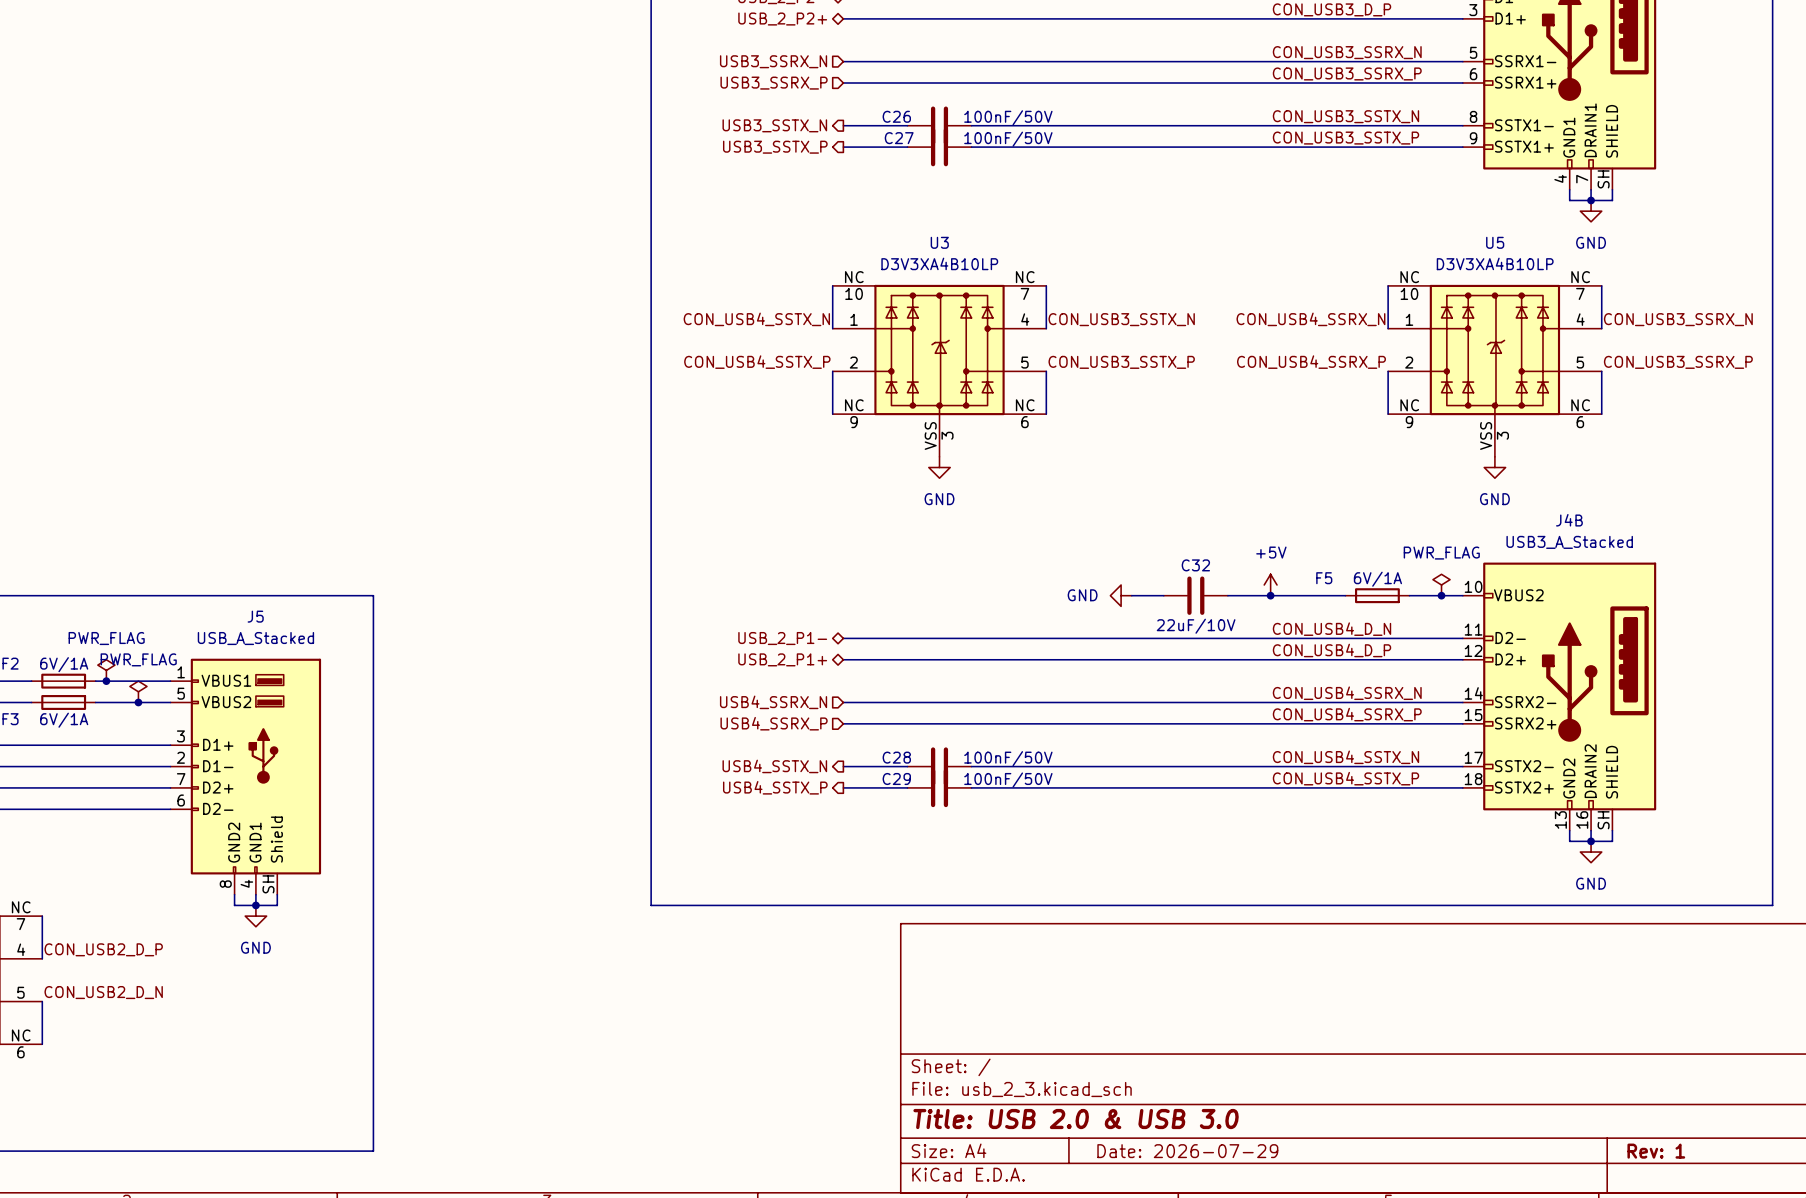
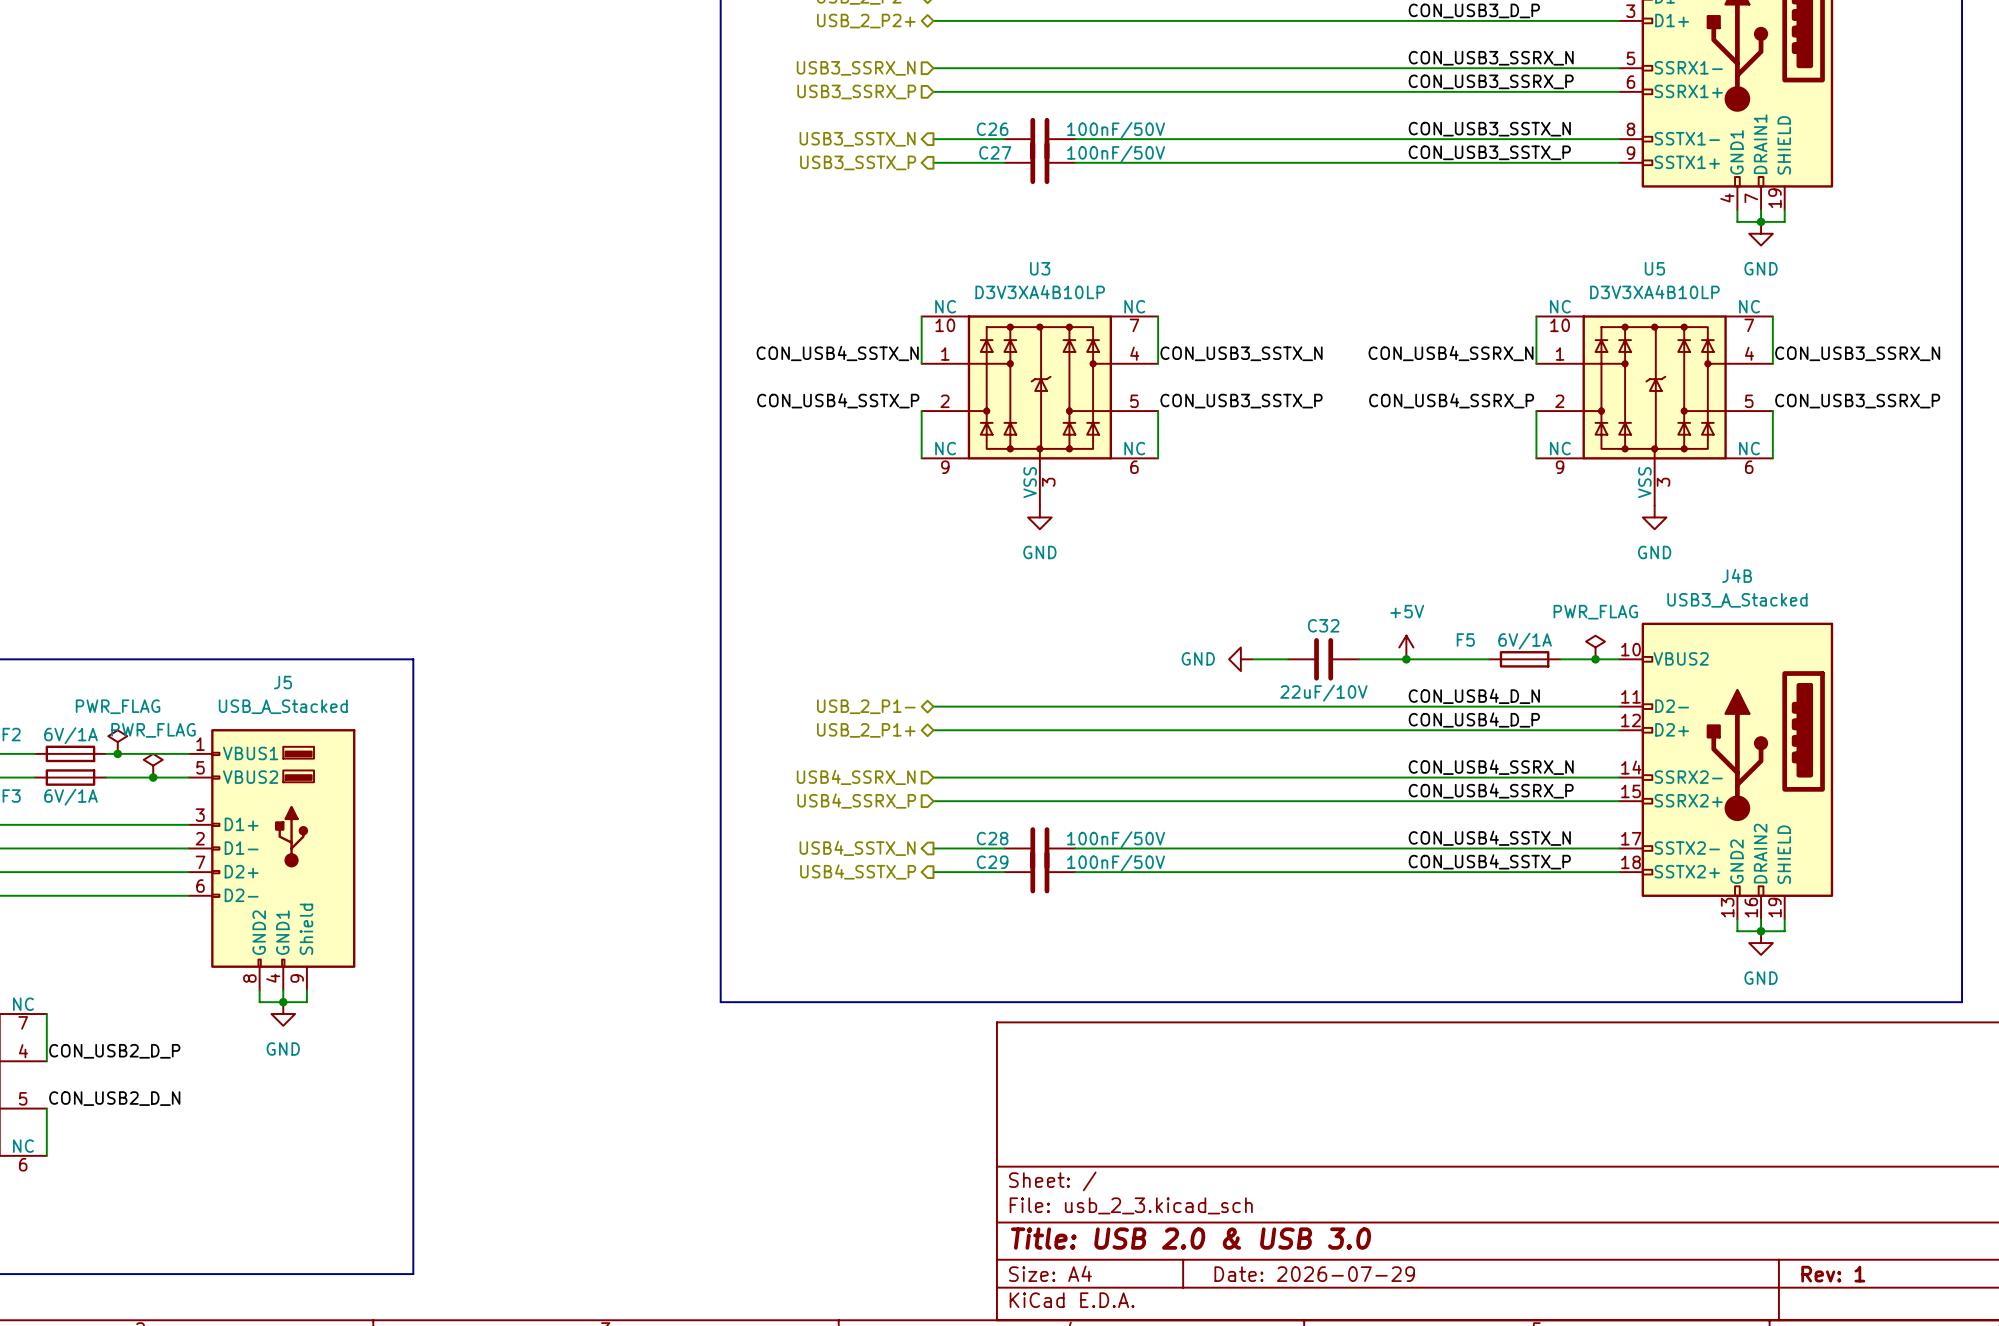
part pin number: SH (1603, 179) -> 19 (1774, 198)
J4B pin number: SH (1603, 820) -> 19 (1774, 907)
J5 pin number: SH (268, 884) -> 9 (297, 978)

